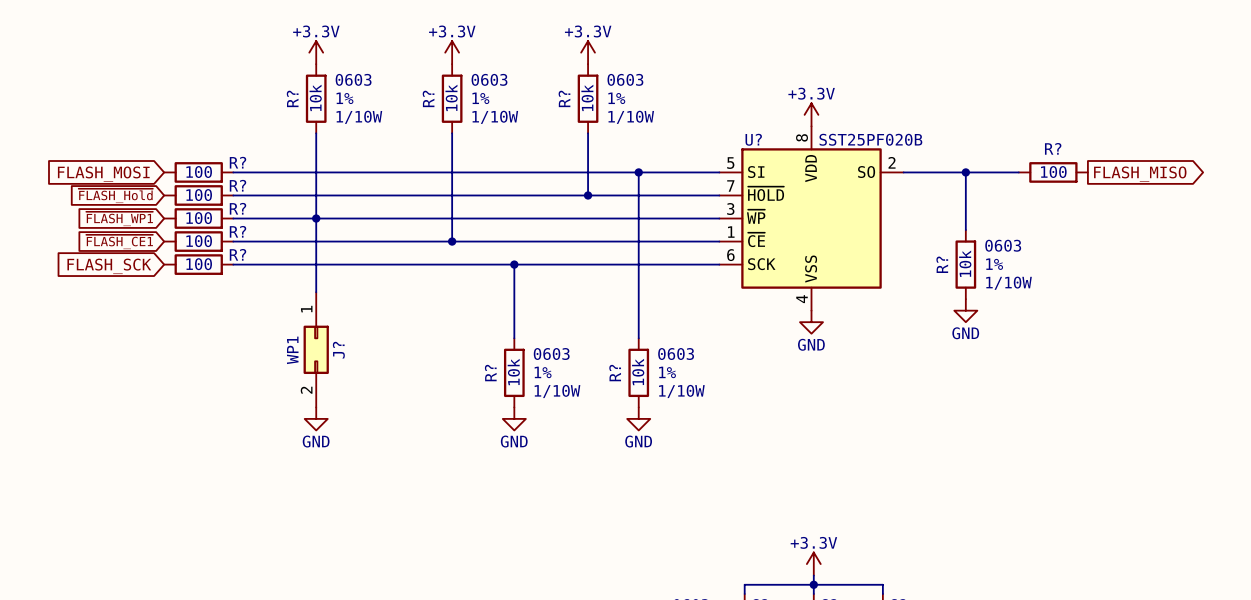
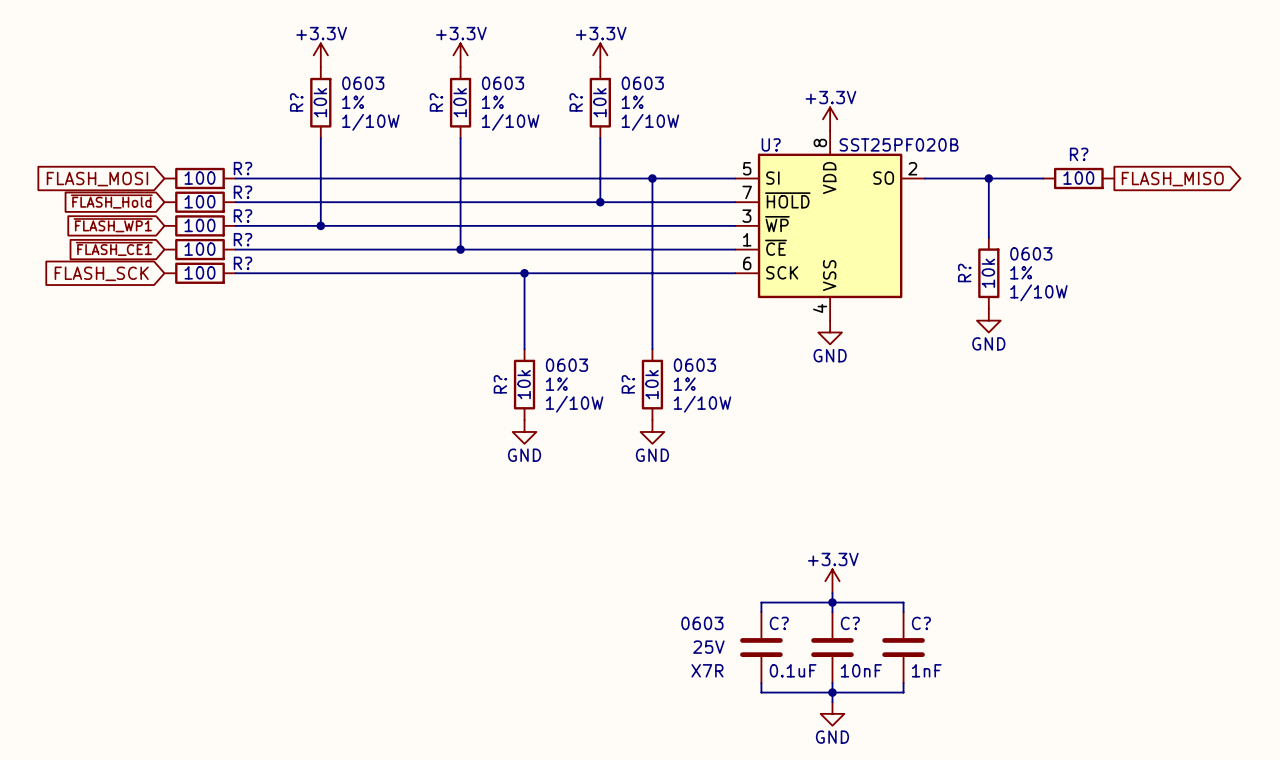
wire: (316, 218) (316, 292) -> none
J?: WP1 (316, 349) -> none
power symbol: GND (316, 418) -> none

